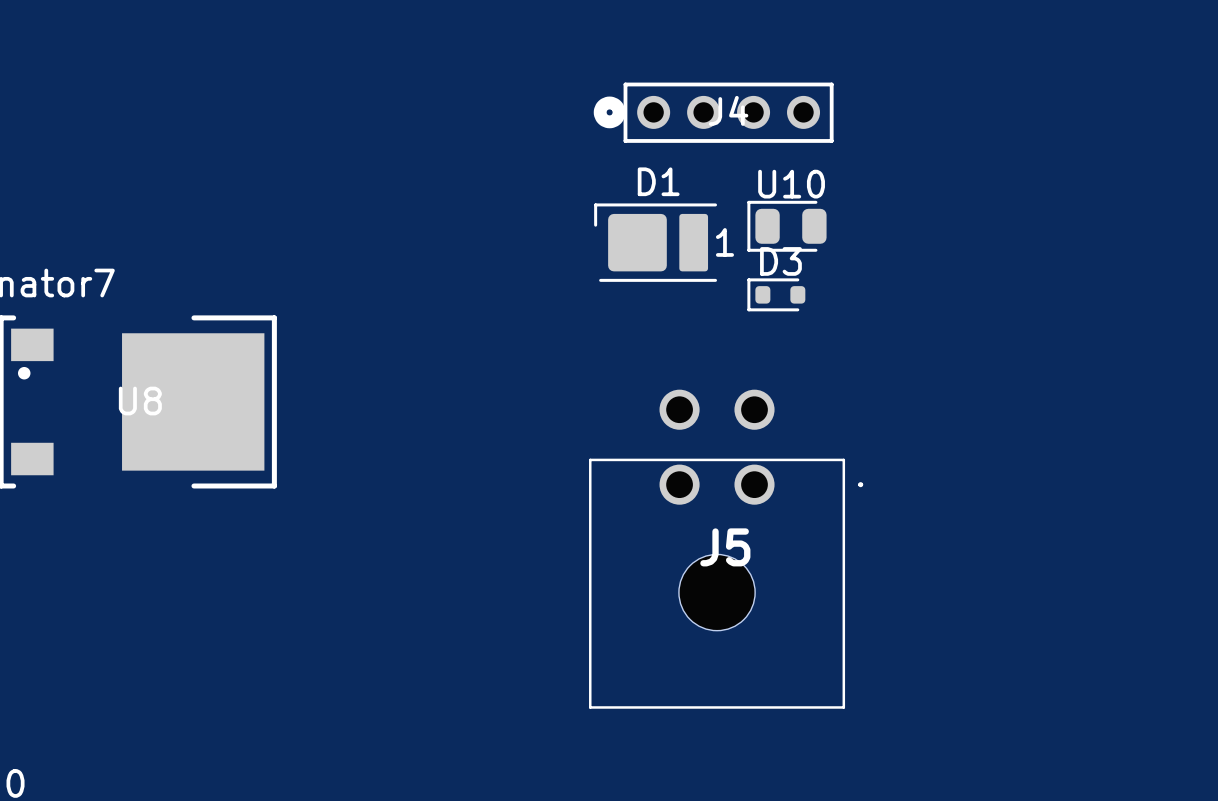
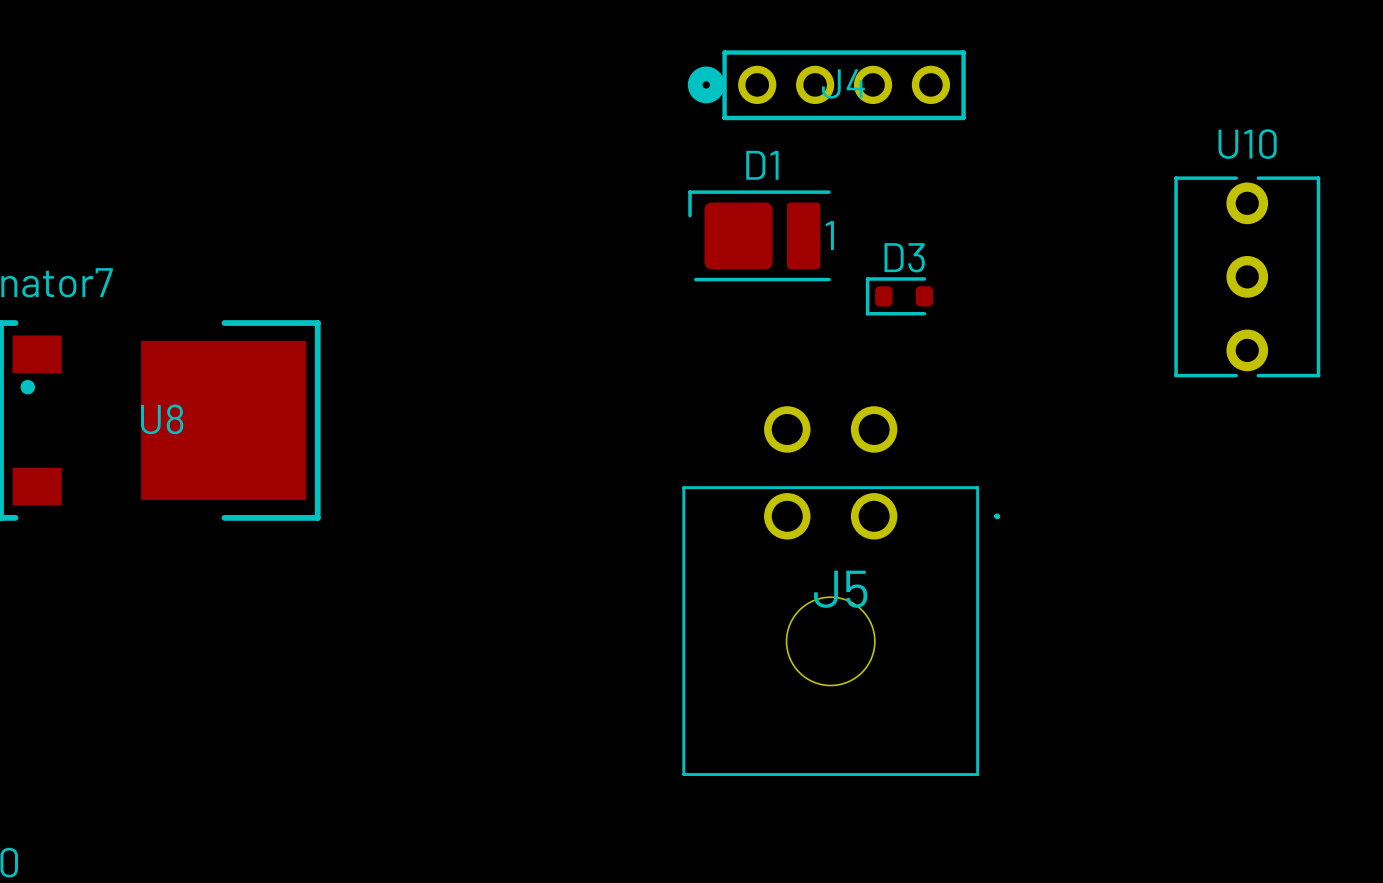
U10 name position: U10 (791, 184) -> U10 (1247, 144)
U10 footprint: [747, 200, 827, 252] -> [1174, 176, 1321, 378]

